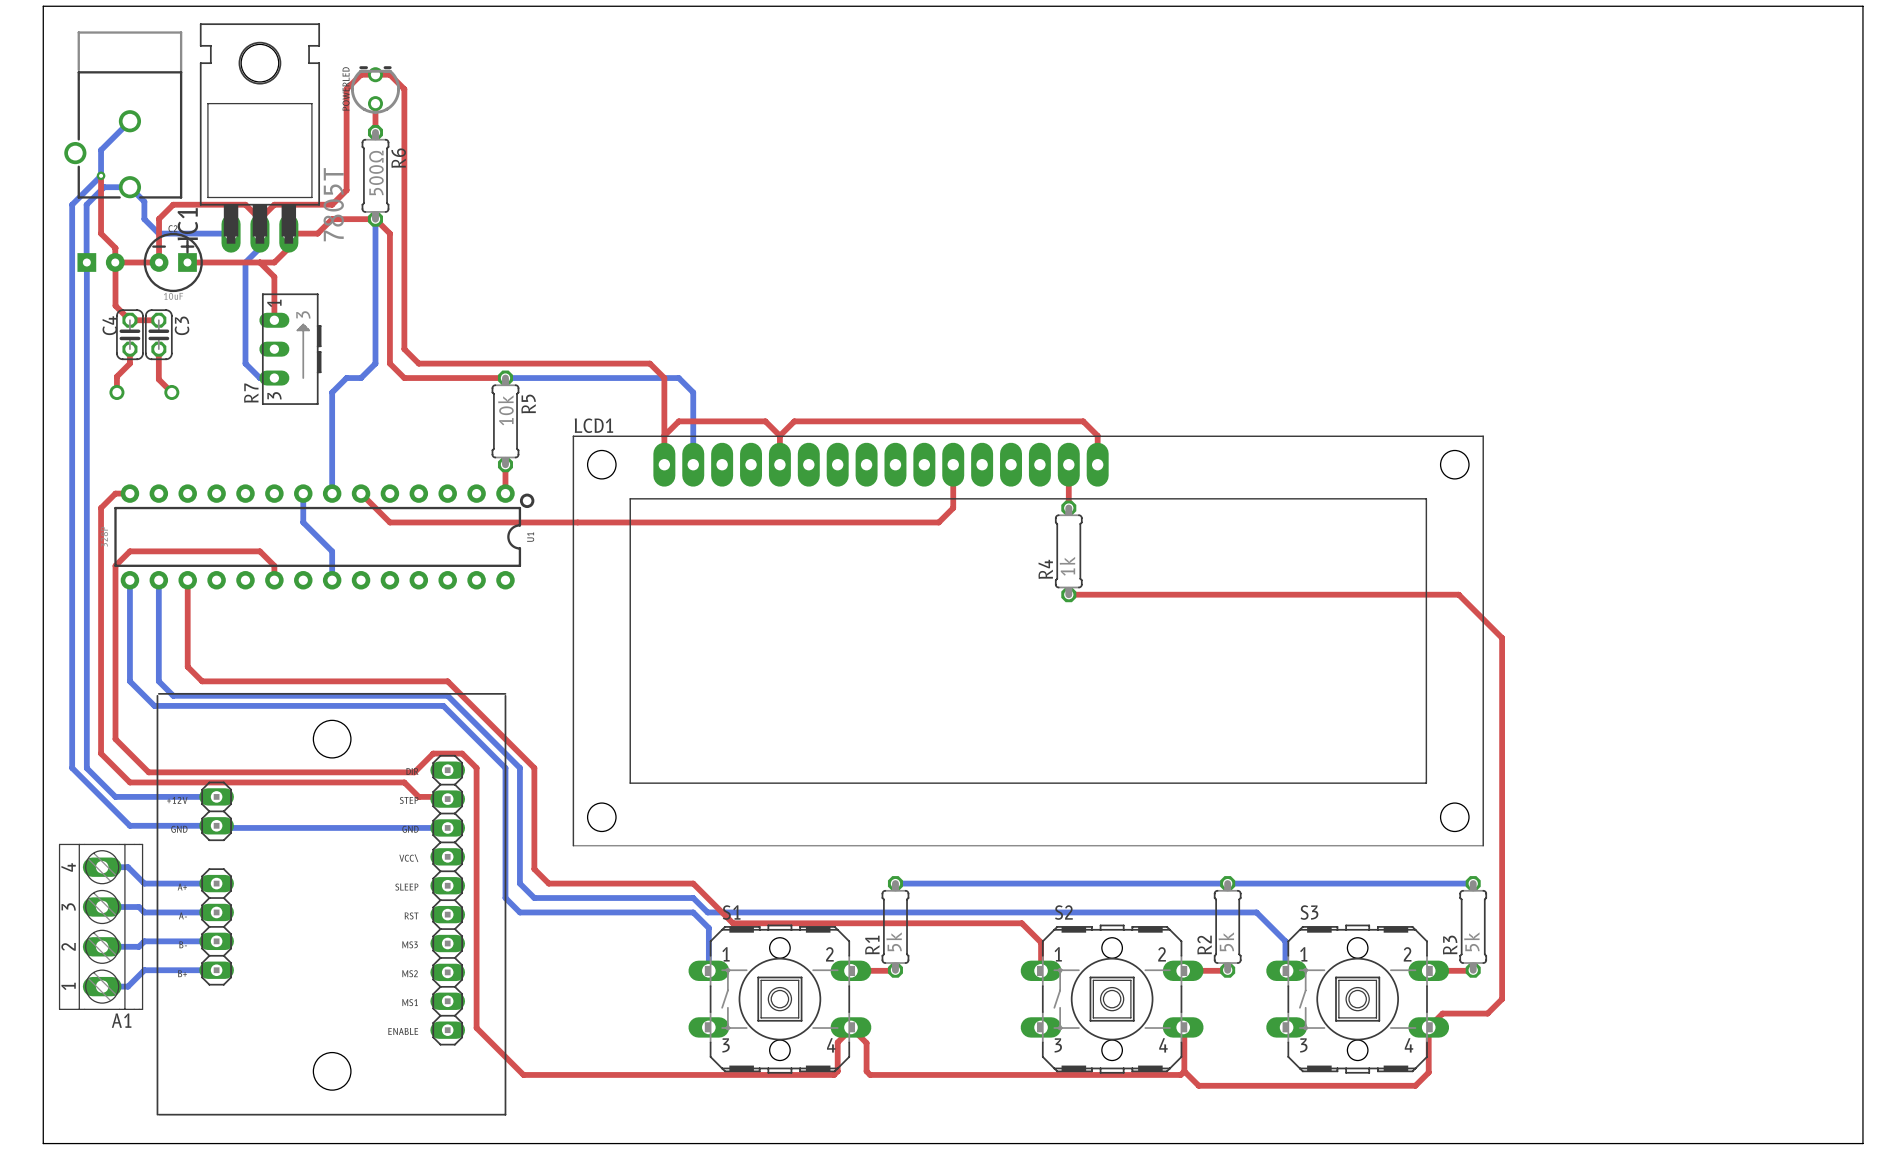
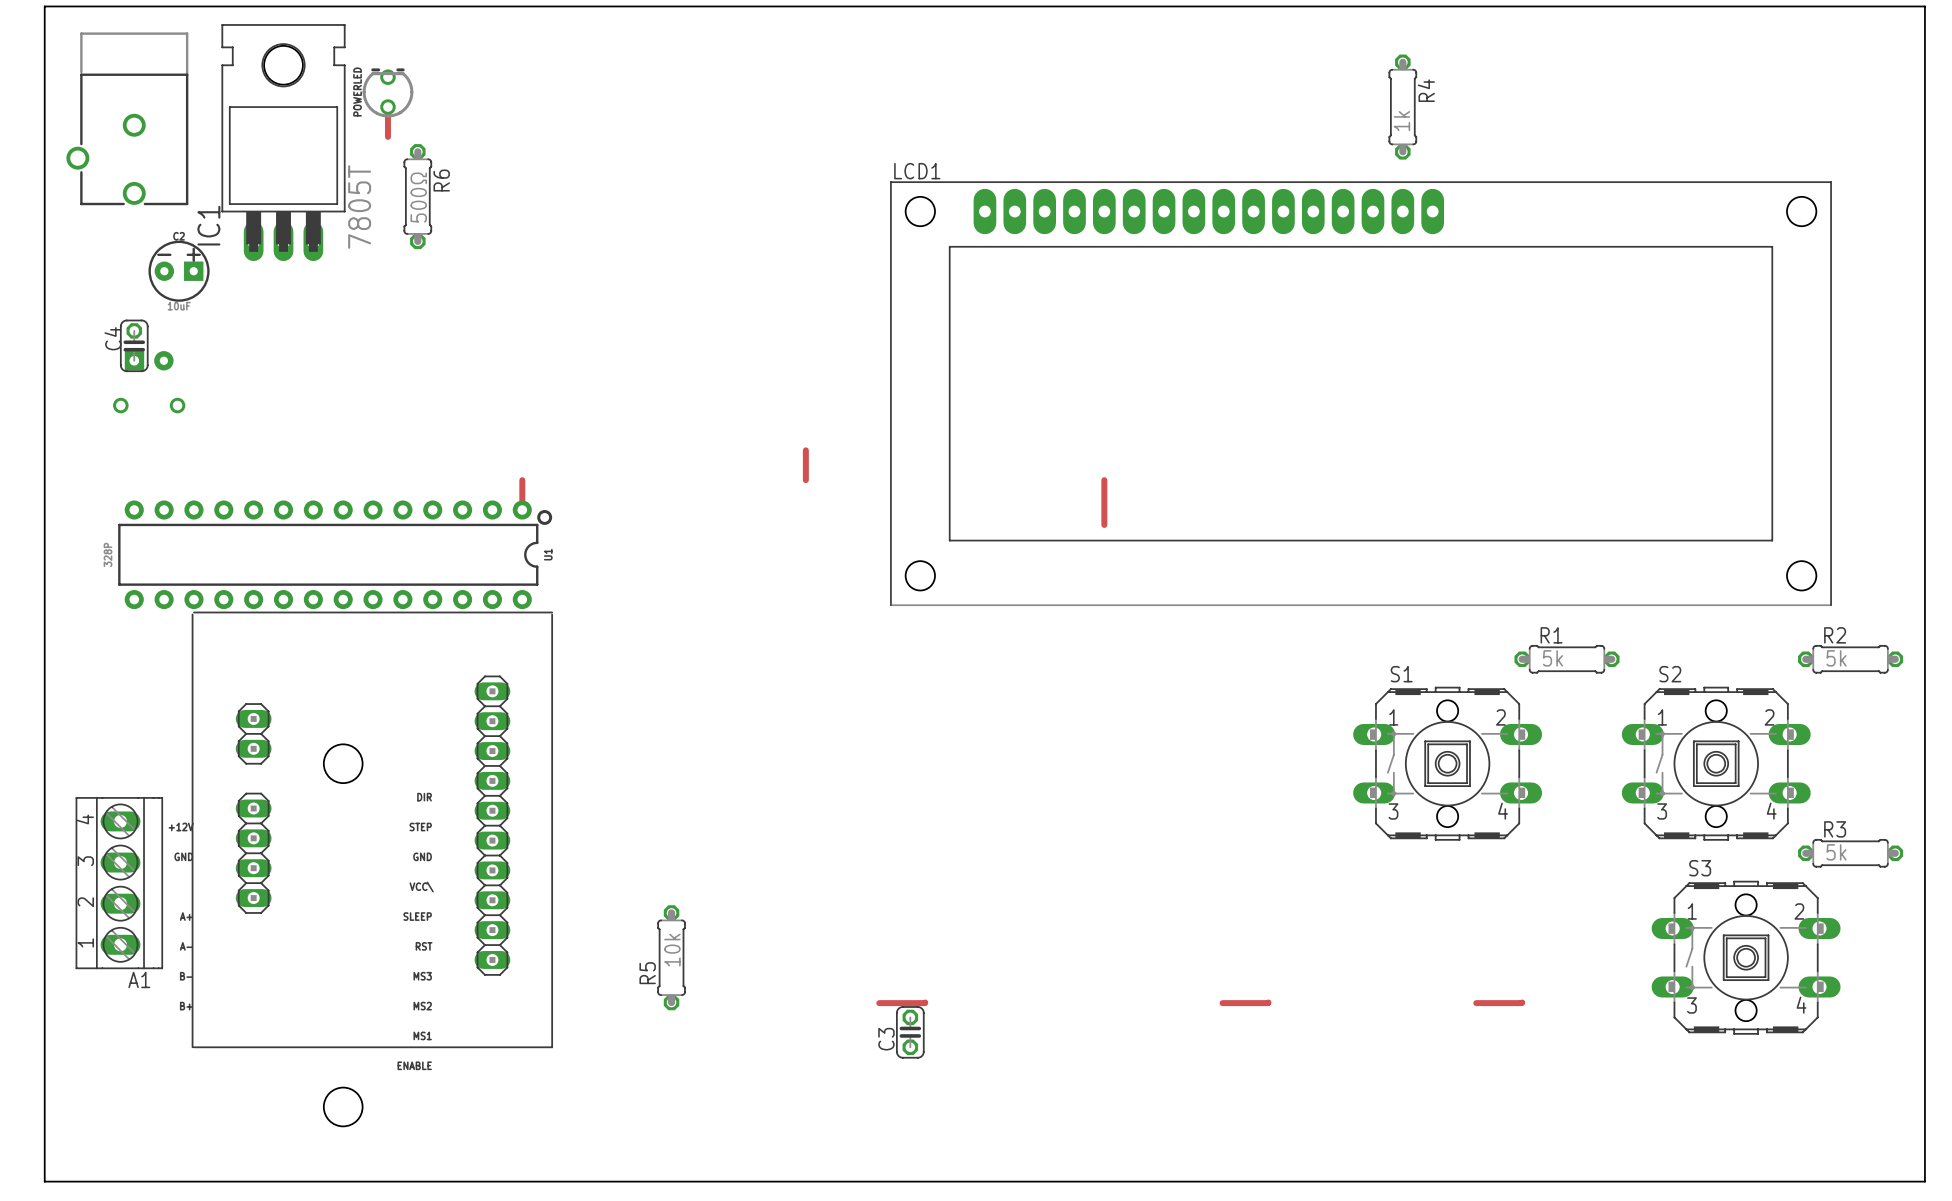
bottom track: (129, 121) (101, 150) (101, 175) (72, 204) (72, 768) (129, 825) (216, 825) (218, 827) (447, 827) -> none
IC1 position: (259, 137) -> (283, 142)
top track: (101, 175) (101, 233) (115, 248) (115, 262) -> none
via: (101, 175) -> none
R6 position: (375, 175) -> (417, 196)
top track: (259, 219) (245, 204) (173, 204) (159, 218) (159, 262) (115, 262) -> none
top track: (259, 219) (274, 204) (332, 204) (346, 190) (346, 89) (361, 74) (389, 74) (404, 89) (404, 349) (418, 363) (649, 363) (664, 378) (664, 464) -> none
bottom track: (375, 219) (375, 363) (361, 378) (346, 378) (332, 392) (332, 493) -> none
bottom track: (231, 233) (158, 233) (144, 219) (144, 201) (129, 187) (104, 187) (86, 204) (86, 768) (115, 796) (216, 796) -> none
bottom track: (259, 233) (259, 248) (245, 262) (245, 363) (259, 378) (274, 378) -> none
part position: (101, 262) -> (149, 360)
top track: (115, 262) (115, 305) (129, 320) (158, 320) -> none
top track: (187, 262) (274, 262) (288, 248) (288, 233) (317, 233) (332, 219) (375, 219) (389, 233) (389, 363) (404, 378) (505, 378) -> none
top track: (259, 262) (274, 276) (274, 320) -> none
C3 rotation: 0° (158, 334) -> 180° (910, 1032)
C3 position: (158, 334) -> (910, 1032)
top track: (129, 349) (129, 363) (116, 376) (116, 392) -> none
top track: (158, 349) (158, 379) (171, 392) -> none
R7: (290, 349) -> none
bottom track: (505, 378) (678, 378) (693, 392) (693, 464) -> none
R5 name position: R5 (528, 404) -> R5 (647, 973)
R5 position: (505, 421) -> (671, 957)
top track: (664, 435) (678, 421) (765, 421) (779, 435) (794, 421) (1083, 421) (1097, 435) (1097, 464) -> none
top track: (953, 464) (953, 508) (938, 522) (389, 522) (361, 493) -> none
top track: (129, 493) (115, 493) (101, 508) (101, 753) (129, 782) (404, 782) (418, 796) (445, 796) (447, 799) -> none
bottom track: (303, 493) (303, 522) (332, 551) (332, 580) -> none
R4 position: (1068, 551) -> (1402, 107)
R4 name position: R4 (1045, 569) -> R4 (1426, 90)
bottom track: (129, 580) (129, 681) (154, 705) (443, 705) (505, 768) (505, 898) (519, 912) (693, 912) (708, 928) (708, 970) -> none
bottom track: (158, 580) (158, 681) (173, 695) (447, 695) (519, 768) (519, 883) (534, 898) (693, 898) (707, 912) (1256, 912) (1285, 941) (1285, 970) -> none
top track: (187, 580) (187, 666) (202, 681) (447, 681) (534, 768) (534, 869) (548, 883) (693, 883) (732, 923) (1021, 923) (1041, 942) (1041, 970) -> none
top track: (274, 580) (274, 565) (259, 551) (129, 551) (115, 565) (115, 739) (148, 772) (414, 772) (433, 753) (462, 753) (476, 768) (476, 1028) (523, 1074) (834, 1074) (837, 1071) (837, 1042) (851, 1028) -> none
top track: (1068, 594) (1458, 594) (1502, 638) (1502, 999) (1487, 1013) (1442, 1013) (1428, 1027) (1428, 1072) (1415, 1085) (1198, 1085) (1184, 1071) -> none
LCD1 position: (1028, 640) -> (1360, 393)
line: (158, 693) (505, 693) -> (193, 612) (552, 612)
line: (157, 695) (157, 1114) -> (192, 614) (192, 1047)
line: (505, 695) (505, 1114) (158, 1114) -> (552, 614) (552, 1047) (193, 1047)
part position: (216, 811) -> (253, 733)
bottom track: (102, 867) (128, 867) (144, 883) (216, 883) -> none
bottom track: (895, 883) (1473, 883) -> none
part position: (447, 900) -> (492, 825)
bottom track: (102, 907) (138, 907) (144, 912) (216, 912) -> none
A1 position: (101, 926) -> (119, 883)
part position: (216, 926) -> (253, 853)
R1 rotation: 0° (895, 926) -> 90° clockwise (1567, 659)
R1 position: (895, 926) -> (1567, 659)
R2 rotation: 0° (1227, 926) -> 90° clockwise (1850, 659)
R2 position: (1227, 926) -> (1850, 659)
R3 rotation: 0° (1473, 926) -> 90° clockwise (1850, 853)
R3 position: (1473, 926) -> (1850, 853)
bottom track: (216, 941) (144, 941) (138, 946) (102, 946) -> none
bottom track: (216, 970) (144, 970) (128, 986) (102, 986) -> none
S1 position: (779, 999) -> (1447, 763)
S2 position: (1112, 999) -> (1716, 763)
S3 position: (1357, 999) -> (1746, 957)
top track: (850, 1027) (866, 1043) (866, 1071) (870, 1074) (1180, 1074) (1184, 1071) -> none
top track: (1183, 1027) (1184, 1071) -> none

